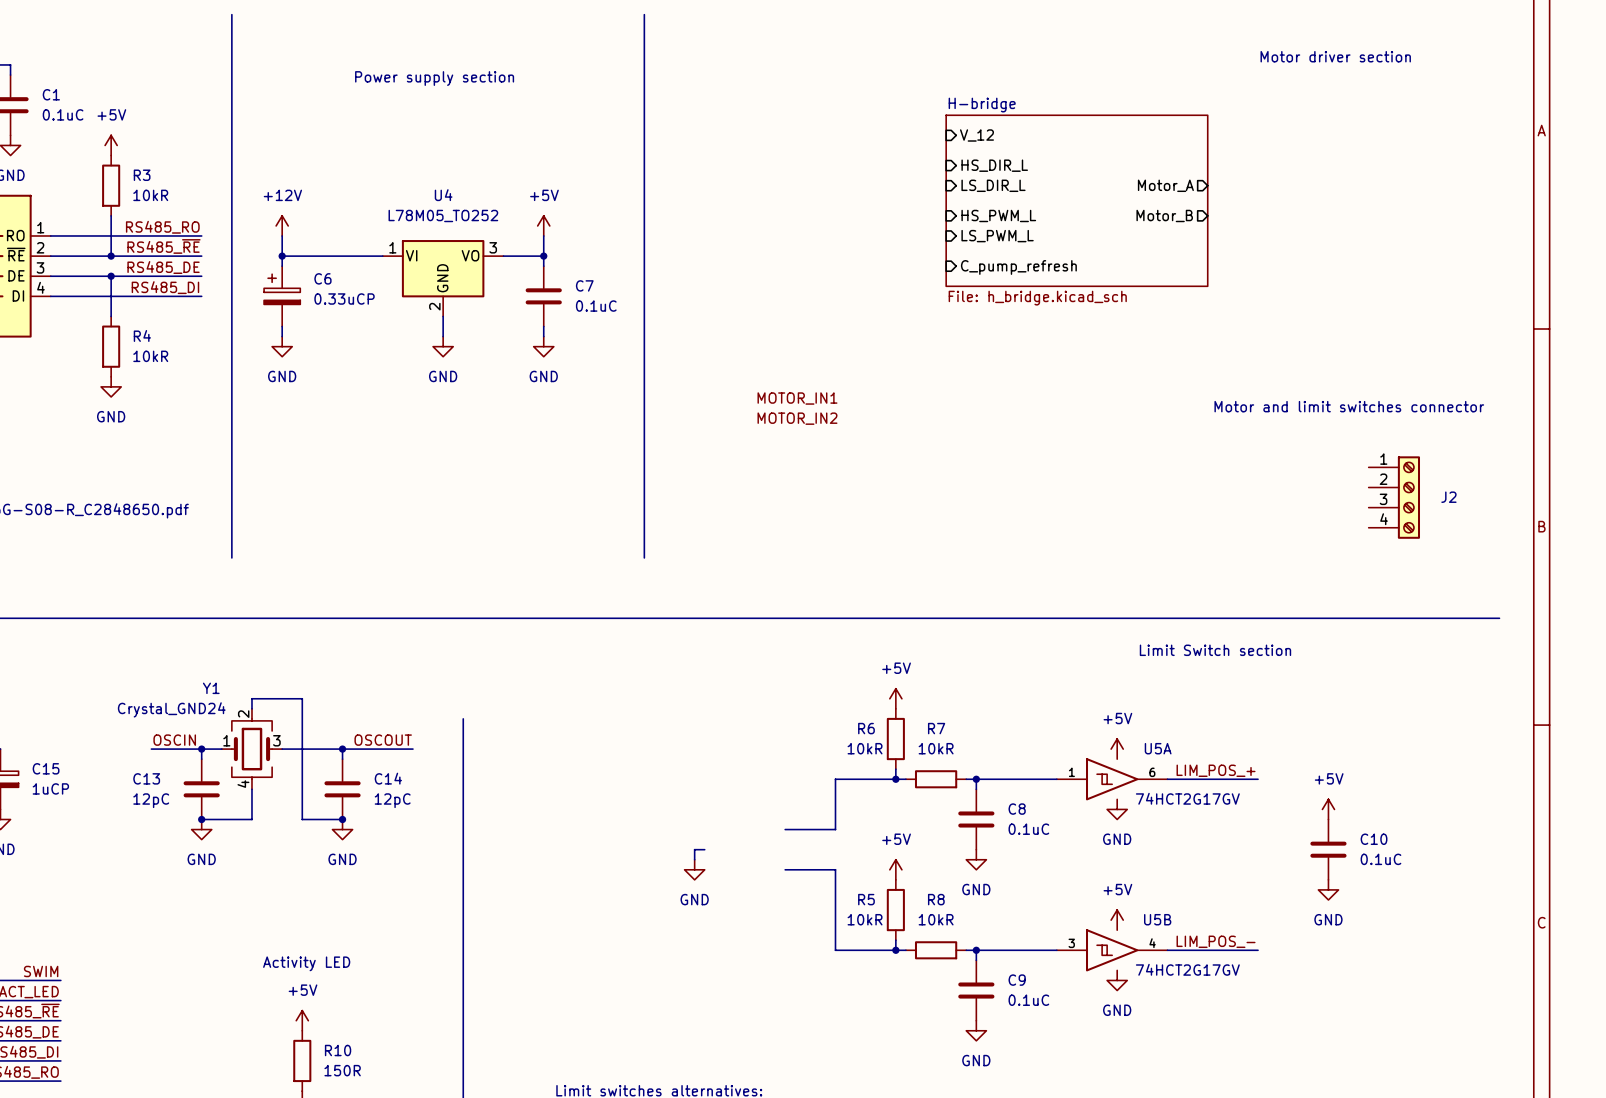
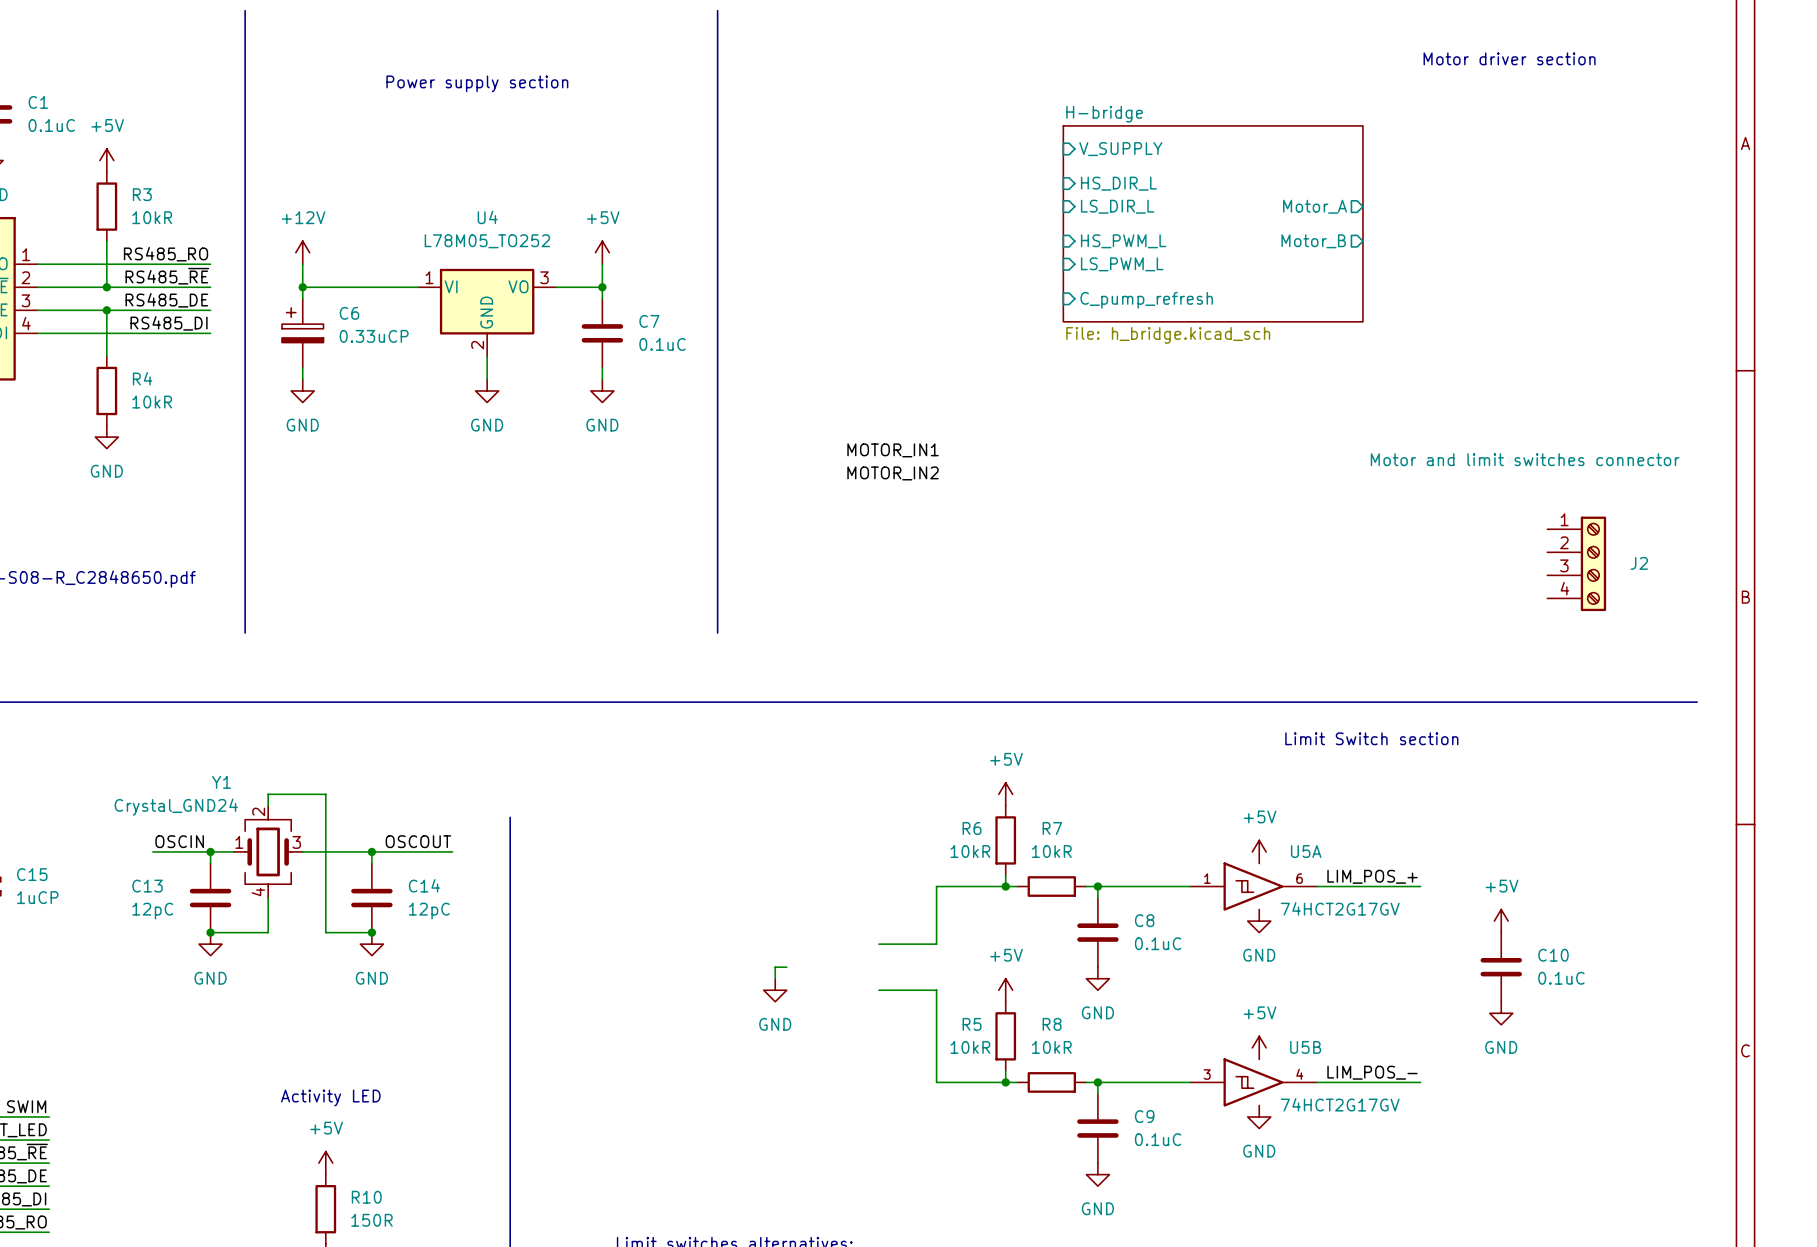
sheet pin: V_12 (976, 135) -> V_SUPPLY (1120, 149)

